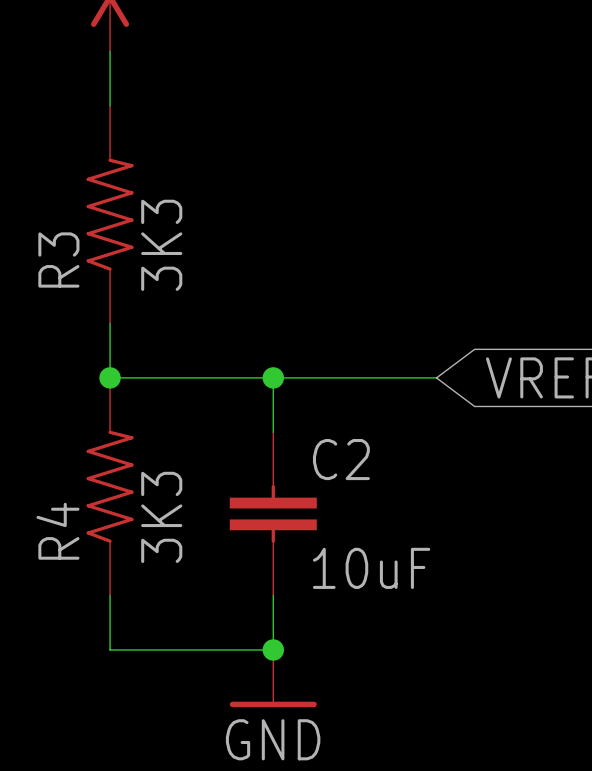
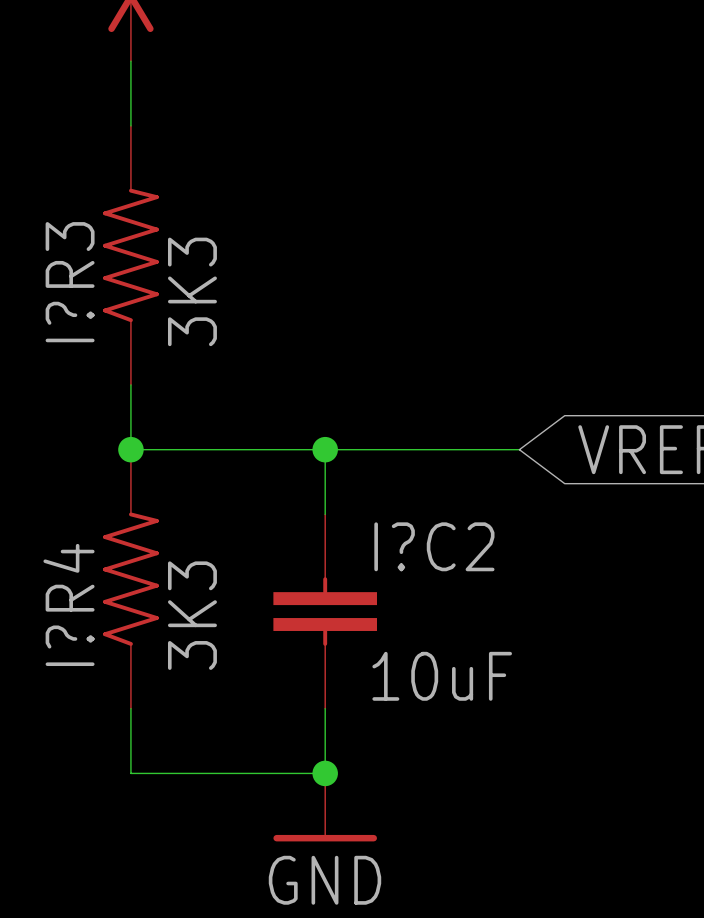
R3 name: R3 (58, 260) -> I?R3 (70, 282)
C2 name: C2 (341, 459) -> I?C2 (434, 546)
R4 name: R4 (57, 531) -> I?R4 (69, 604)

